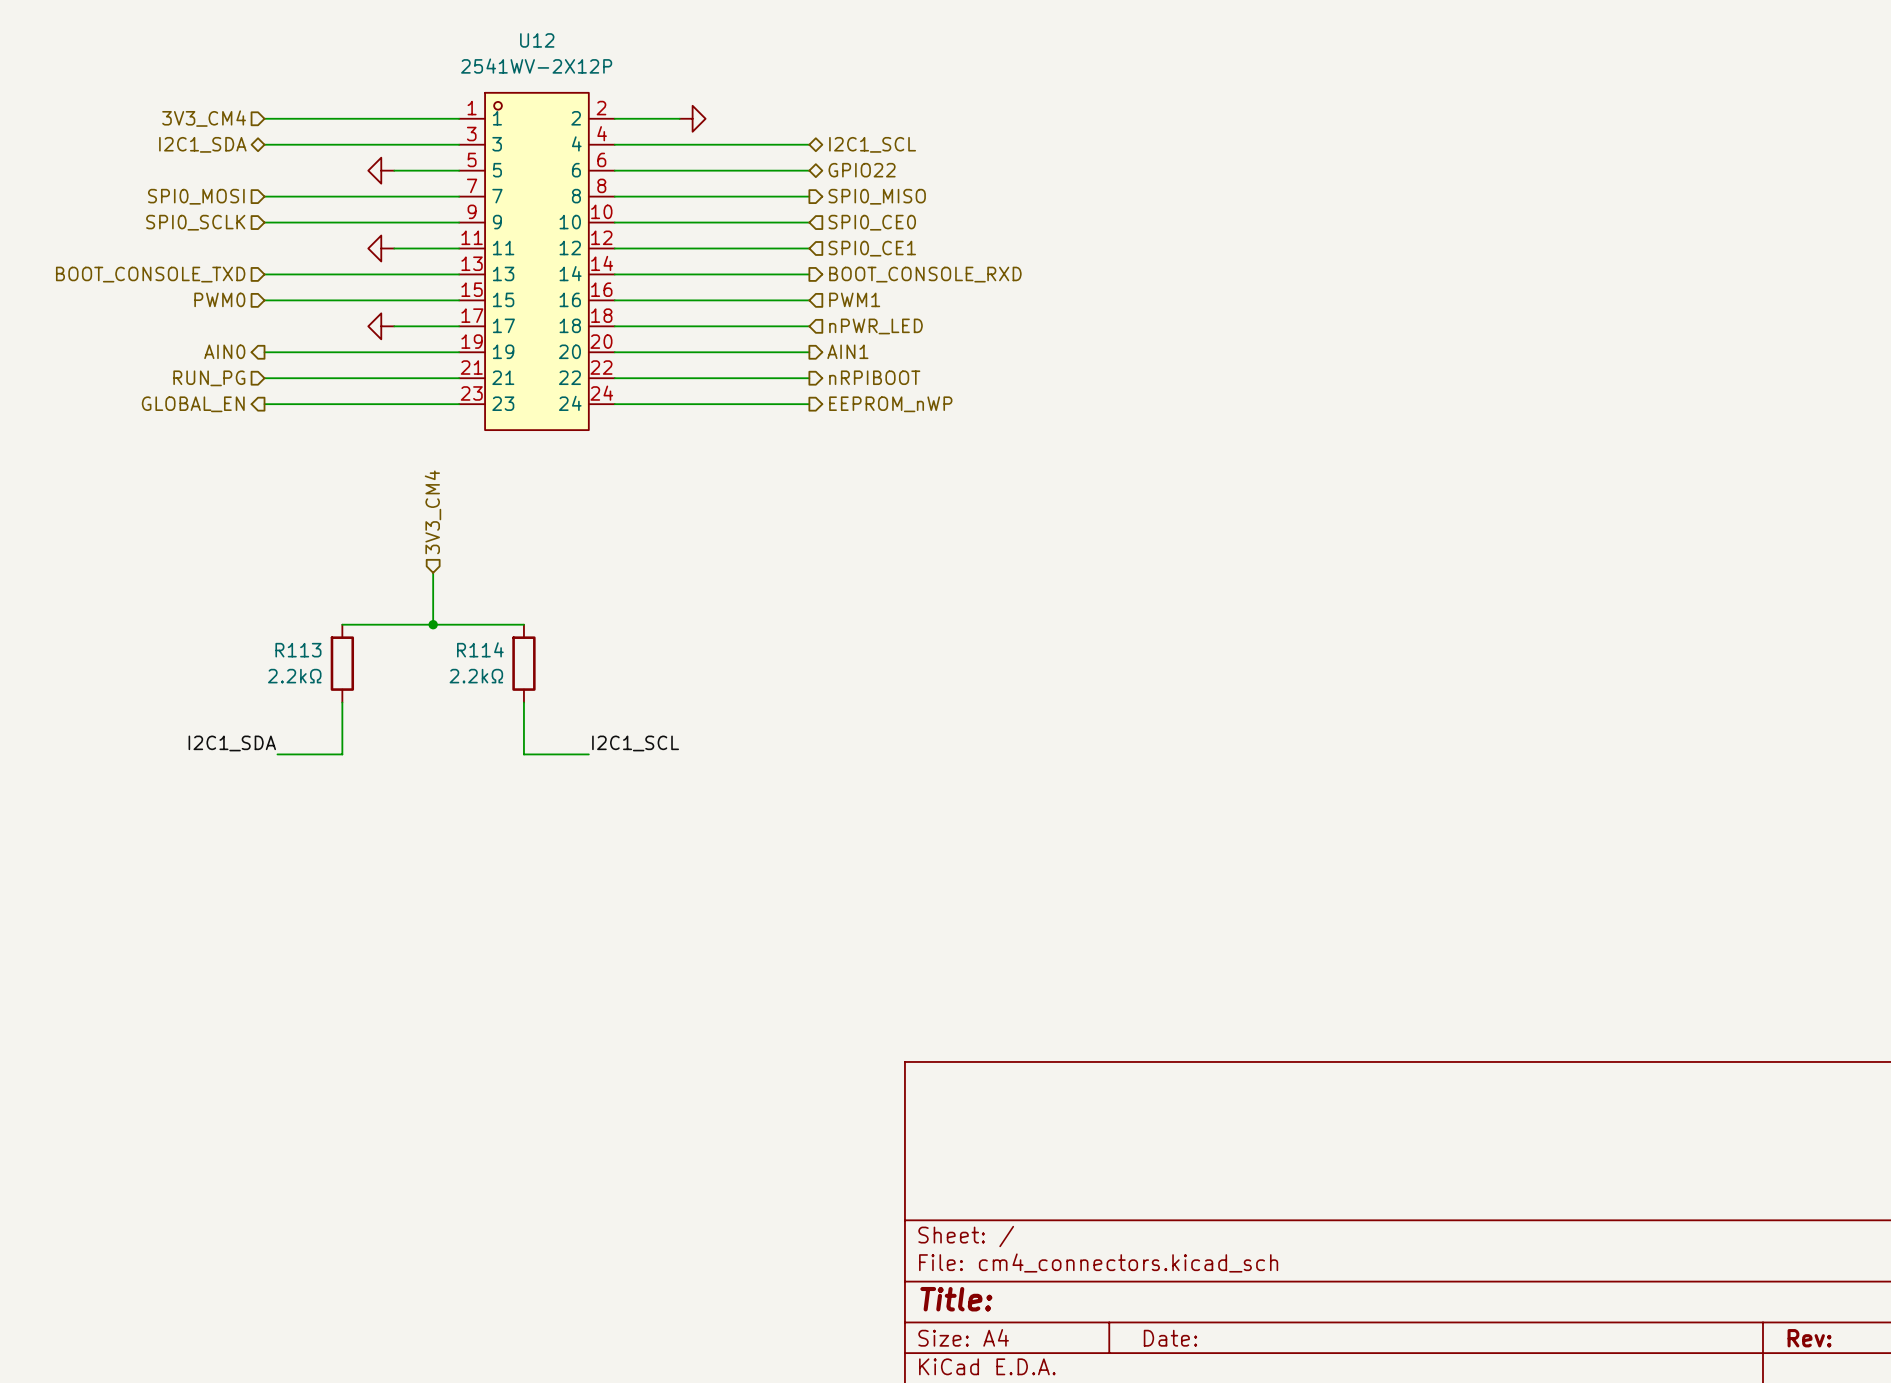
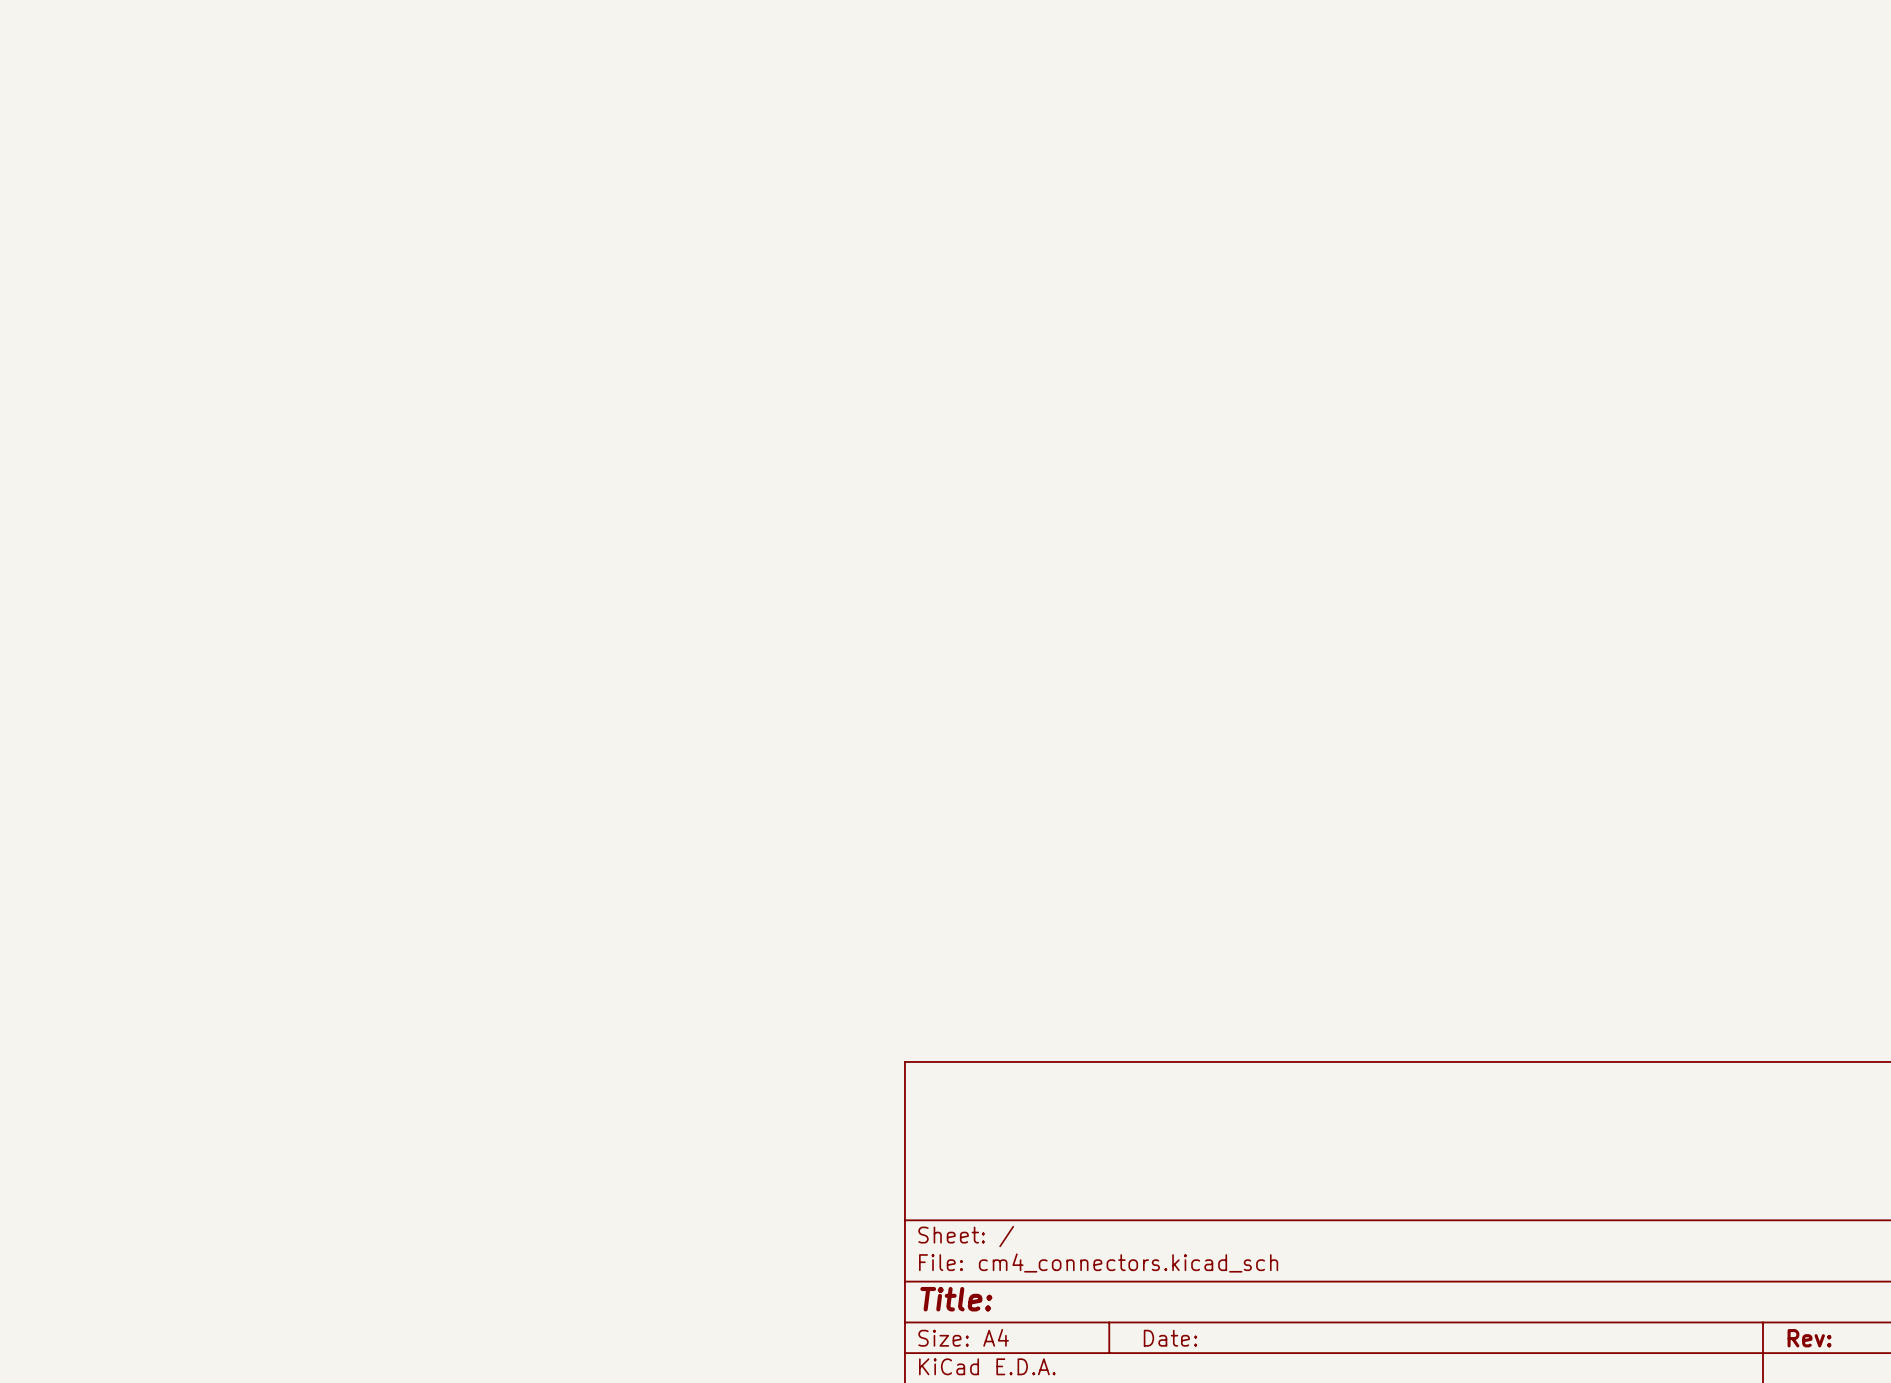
hierarchical label: 3V3_CM4 (204, 118) -> none
wire: (264, 118) (459, 118) -> none
wire: (614, 118) (679, 118) -> none
power symbol: (692, 118) -> none
hierarchical label: I2C1_SDA (202, 144) -> none
wire: (264, 144) (459, 144) -> none
wire: (614, 144) (809, 144) -> none
hierarchical label: I2C1_SCL (872, 144) -> none
power symbol: (381, 170) -> none
wire: (394, 170) (459, 170) -> none
wire: (614, 170) (809, 170) -> none
hierarchical label: GPIO22 (862, 170) -> none
hierarchical label: SPI0_MOSI (196, 196) -> none
wire: (264, 196) (459, 196) -> none
wire: (614, 196) (809, 196) -> none
hierarchical label: SPI0_MISO (877, 196) -> none
hierarchical label: SPI0_SCLK (195, 222) -> none
wire: (264, 222) (459, 222) -> none
wire: (614, 222) (809, 222) -> none
hierarchical label: SPI0_CE0 (872, 222) -> none
power symbol: (381, 248) -> none
wire: (394, 248) (459, 248) -> none
wire: (614, 248) (809, 248) -> none
hierarchical label: SPI0_CE1 (872, 248) -> none
U12: 2541WV-2X12P (536, 261) -> none
hierarchical label: BOOT_CONSOLE_TXD (150, 274) -> none
wire: (264, 274) (459, 274) -> none
wire: (614, 274) (809, 274) -> none
hierarchical label: BOOT_CONSOLE_RXD (925, 274) -> none
hierarchical label: PWM0 (219, 299) -> none
hierarchical label: PWM1 (854, 299) -> none
wire: (264, 300) (459, 300) -> none
wire: (614, 300) (809, 300) -> none
power symbol: (381, 326) -> none
wire: (394, 326) (459, 326) -> none
wire: (614, 326) (809, 326) -> none
hierarchical label: nPWR_LED (875, 326) -> none
hierarchical label: AIN0 (224, 351) -> none
hierarchical label: AIN1 (847, 351) -> none
wire: (264, 352) (459, 352) -> none
wire: (614, 352) (809, 352) -> none
hierarchical label: nRPIBOOT (874, 377) -> none
hierarchical label: RUN_PG (209, 378) -> none
wire: (264, 378) (459, 378) -> none
wire: (614, 378) (809, 378) -> none
hierarchical label: GLOBAL_EN (193, 404) -> none
wire: (264, 404) (459, 404) -> none
wire: (614, 404) (809, 404) -> none
hierarchical label: EEPROM_nWP (890, 404) -> none
hierarchical label: 3V3_CM4 (432, 512) -> none
wire: (433, 572) (433, 624) -> none
wire: (342, 624) (523, 624) -> none
junction: (433, 624) -> none
R113: 2.2kΩ (342, 663) -> none
R114: 2.2kΩ (523, 663) -> none
wire: (342, 702) (342, 754) (277, 754) -> none
wire: (523, 702) (523, 754) (588, 754) -> none
label: I2C1_SDA (232, 743) -> none
label: I2C1_SCL (635, 743) -> none

